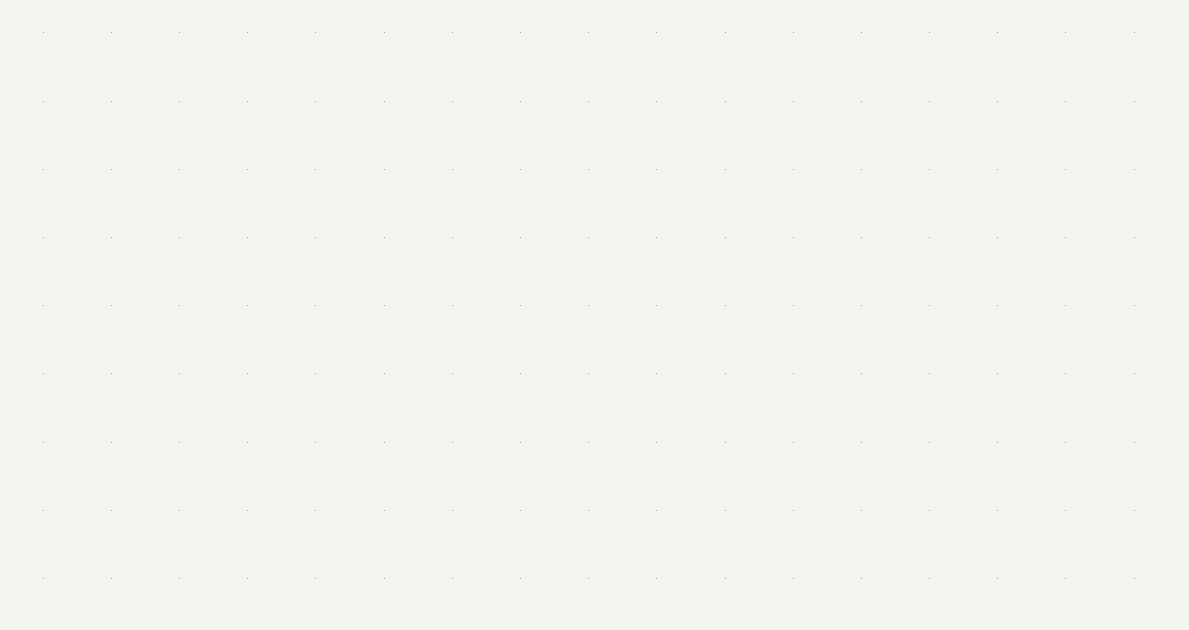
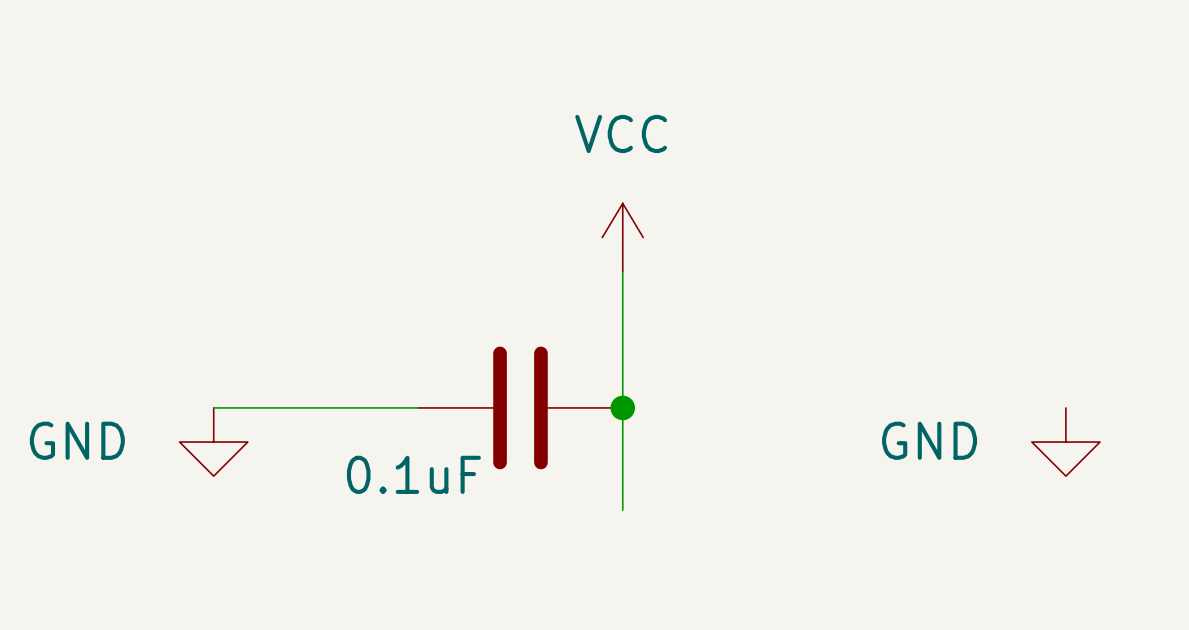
power symbol: none -> VCC (622, 237)
wire: none -> (622, 271) (622, 510)
wire: none -> (213, 407) (418, 407)
part: none -> 0.1uF (520, 407)
junction: none -> (622, 407)
power symbol: none -> GND (213, 442)
power symbol: none -> GND (1065, 442)

